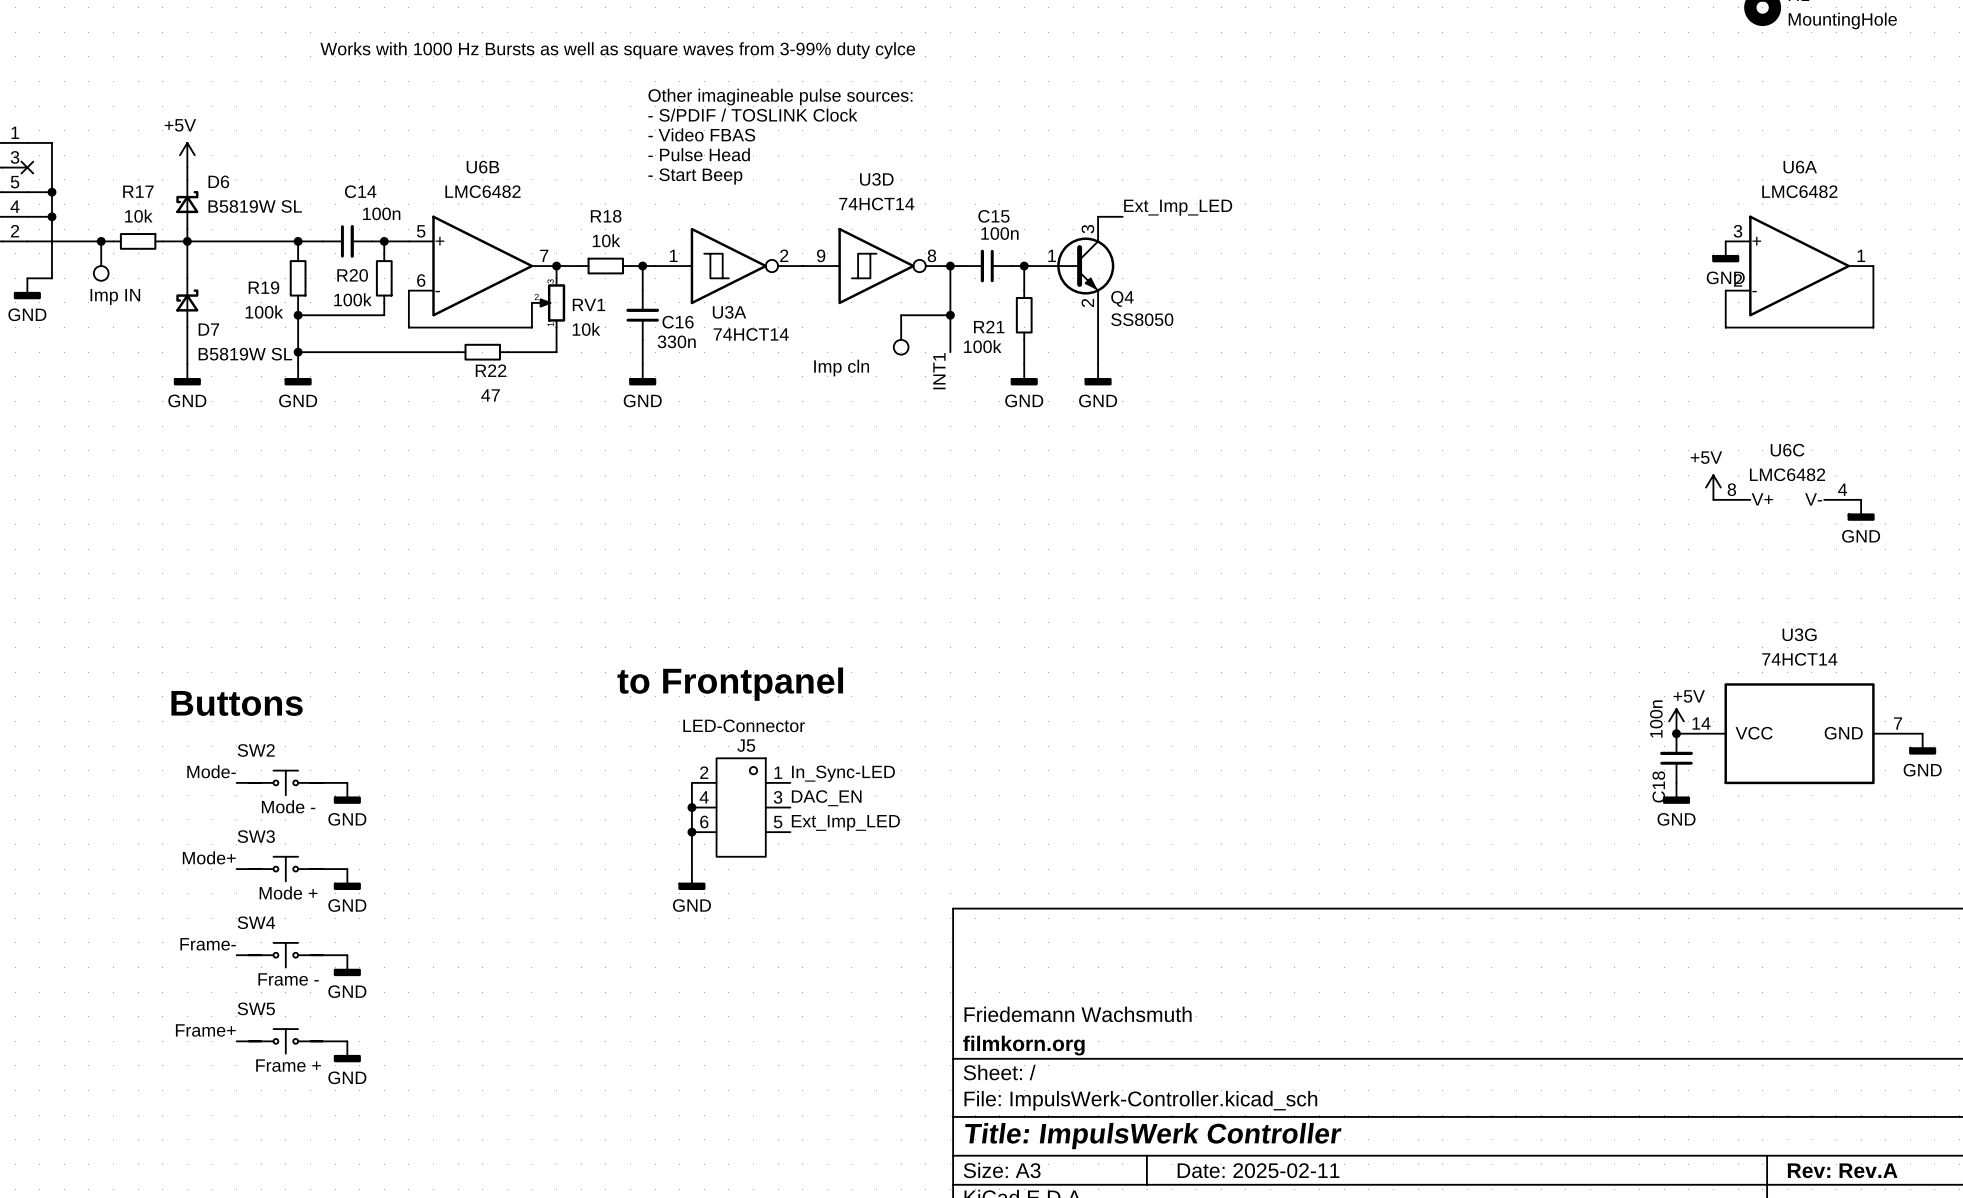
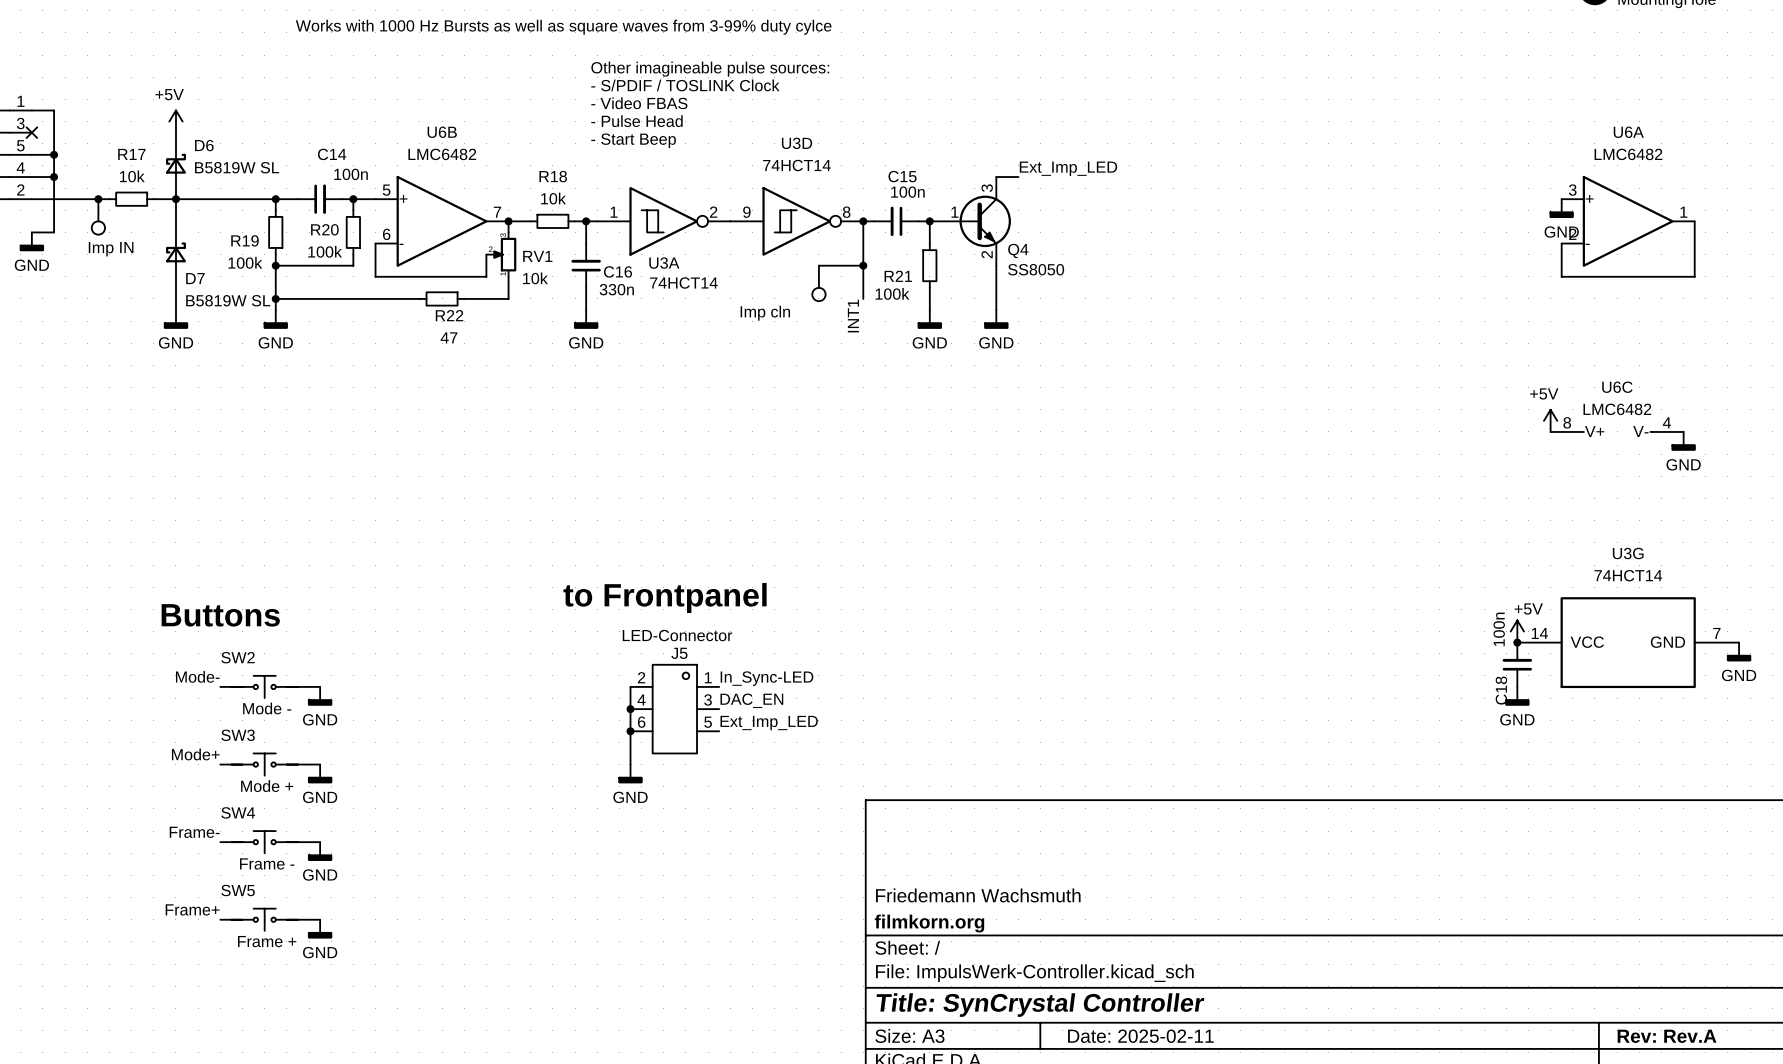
title block: Title: ImpulsWerk Controller (1153, 1136) -> Title: SynCrystal Controller (1040, 1005)

